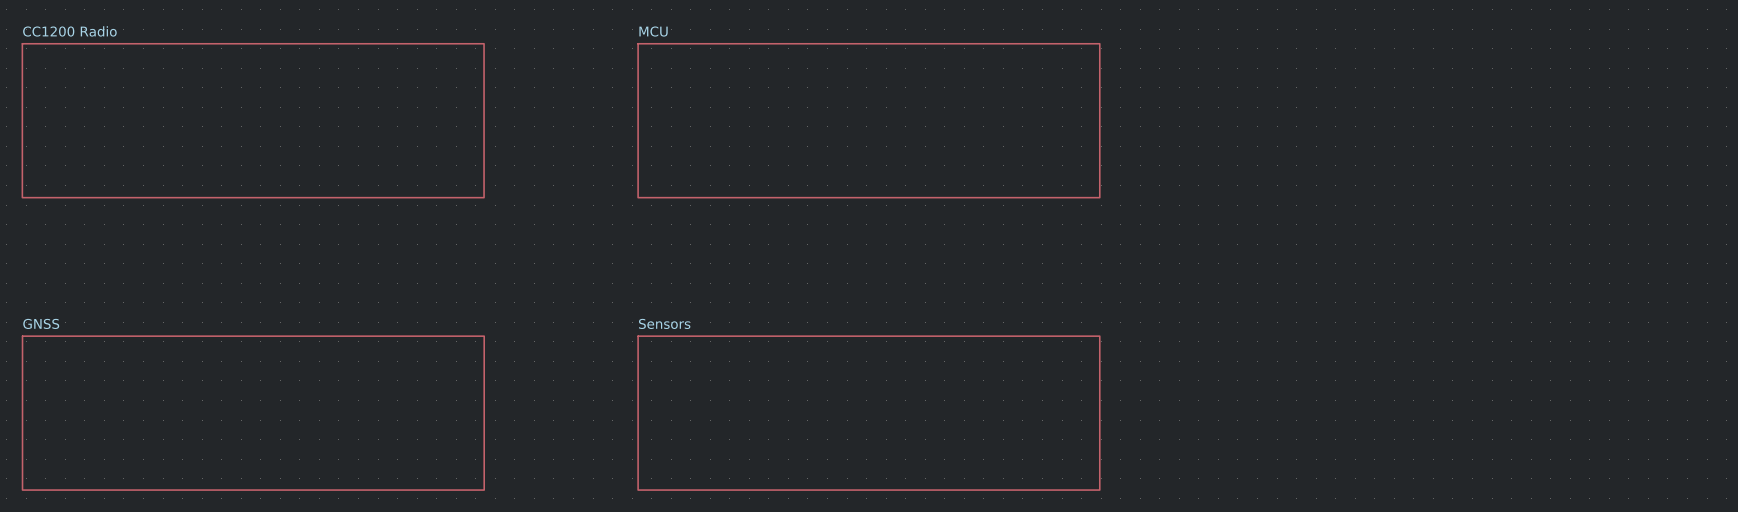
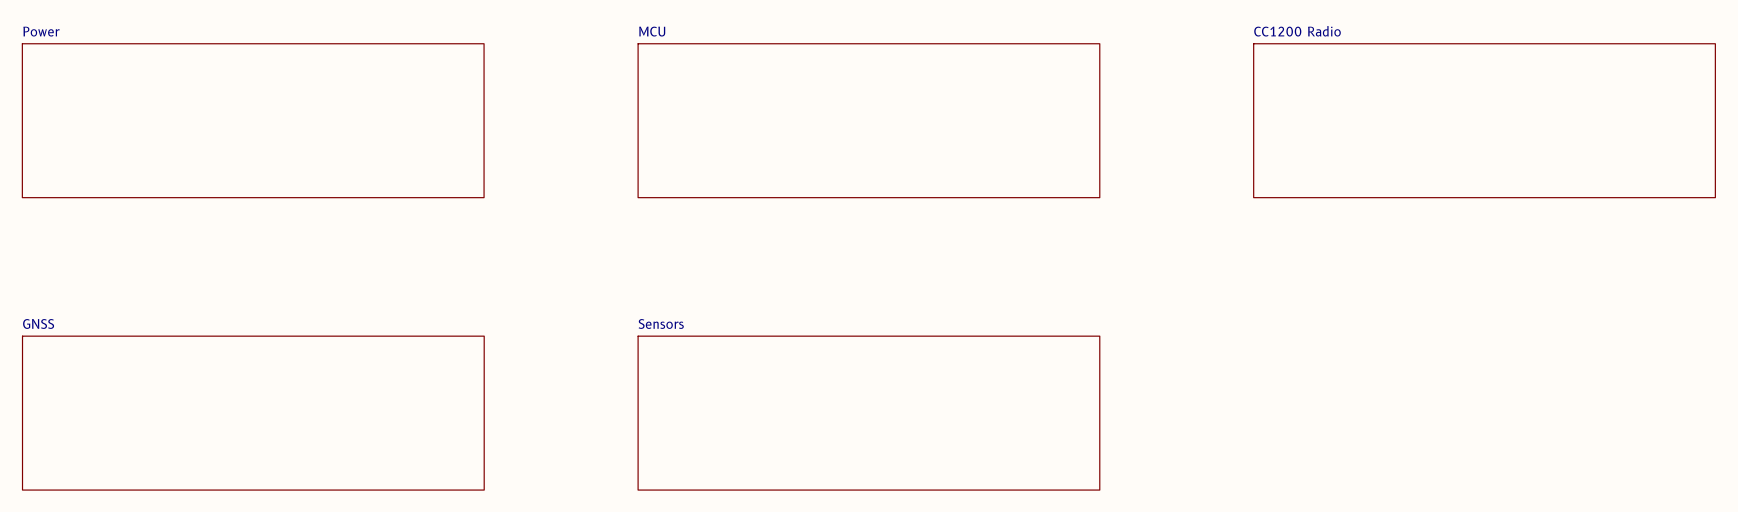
sheet CC1200 Radio name: CC1200 Radio (69, 31) -> Power (41, 31)
sheet CC1200 Radio: none -> (1484, 120)

